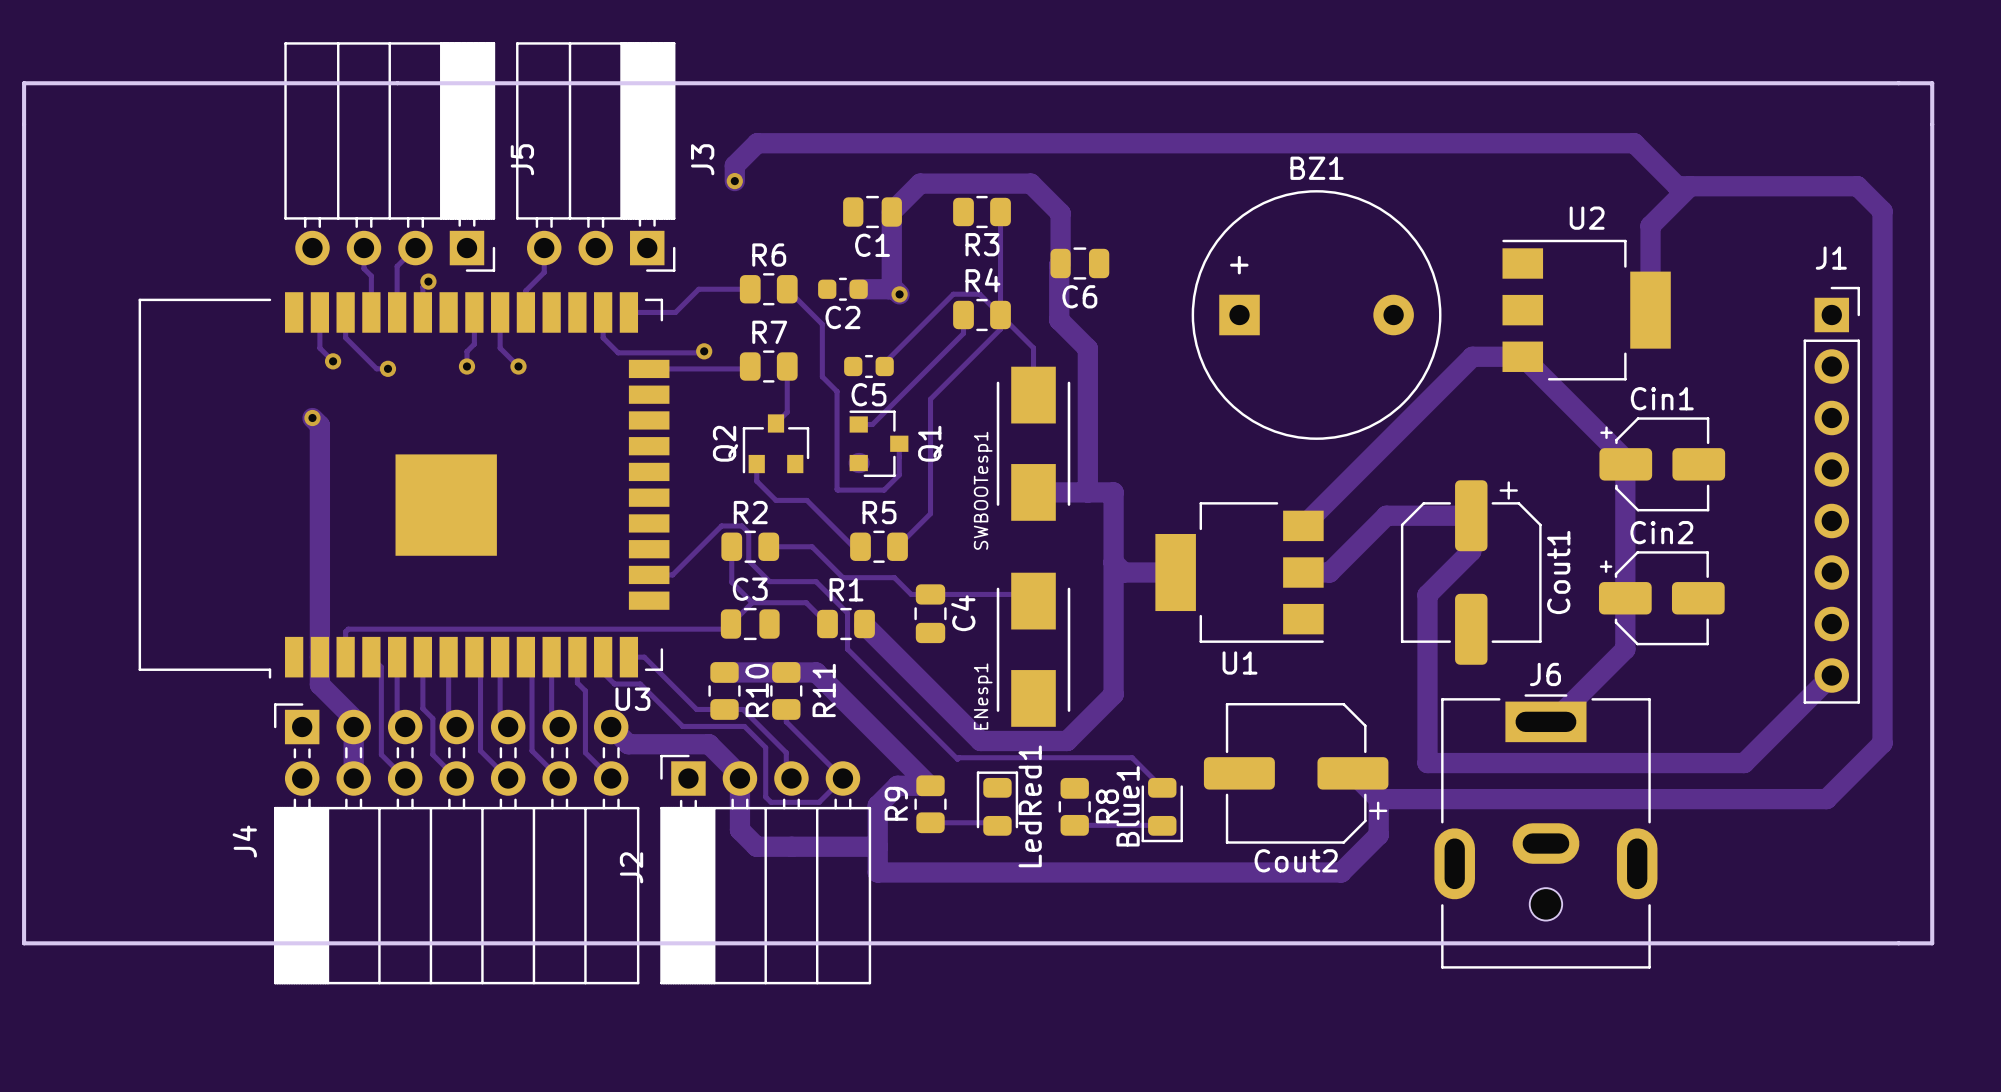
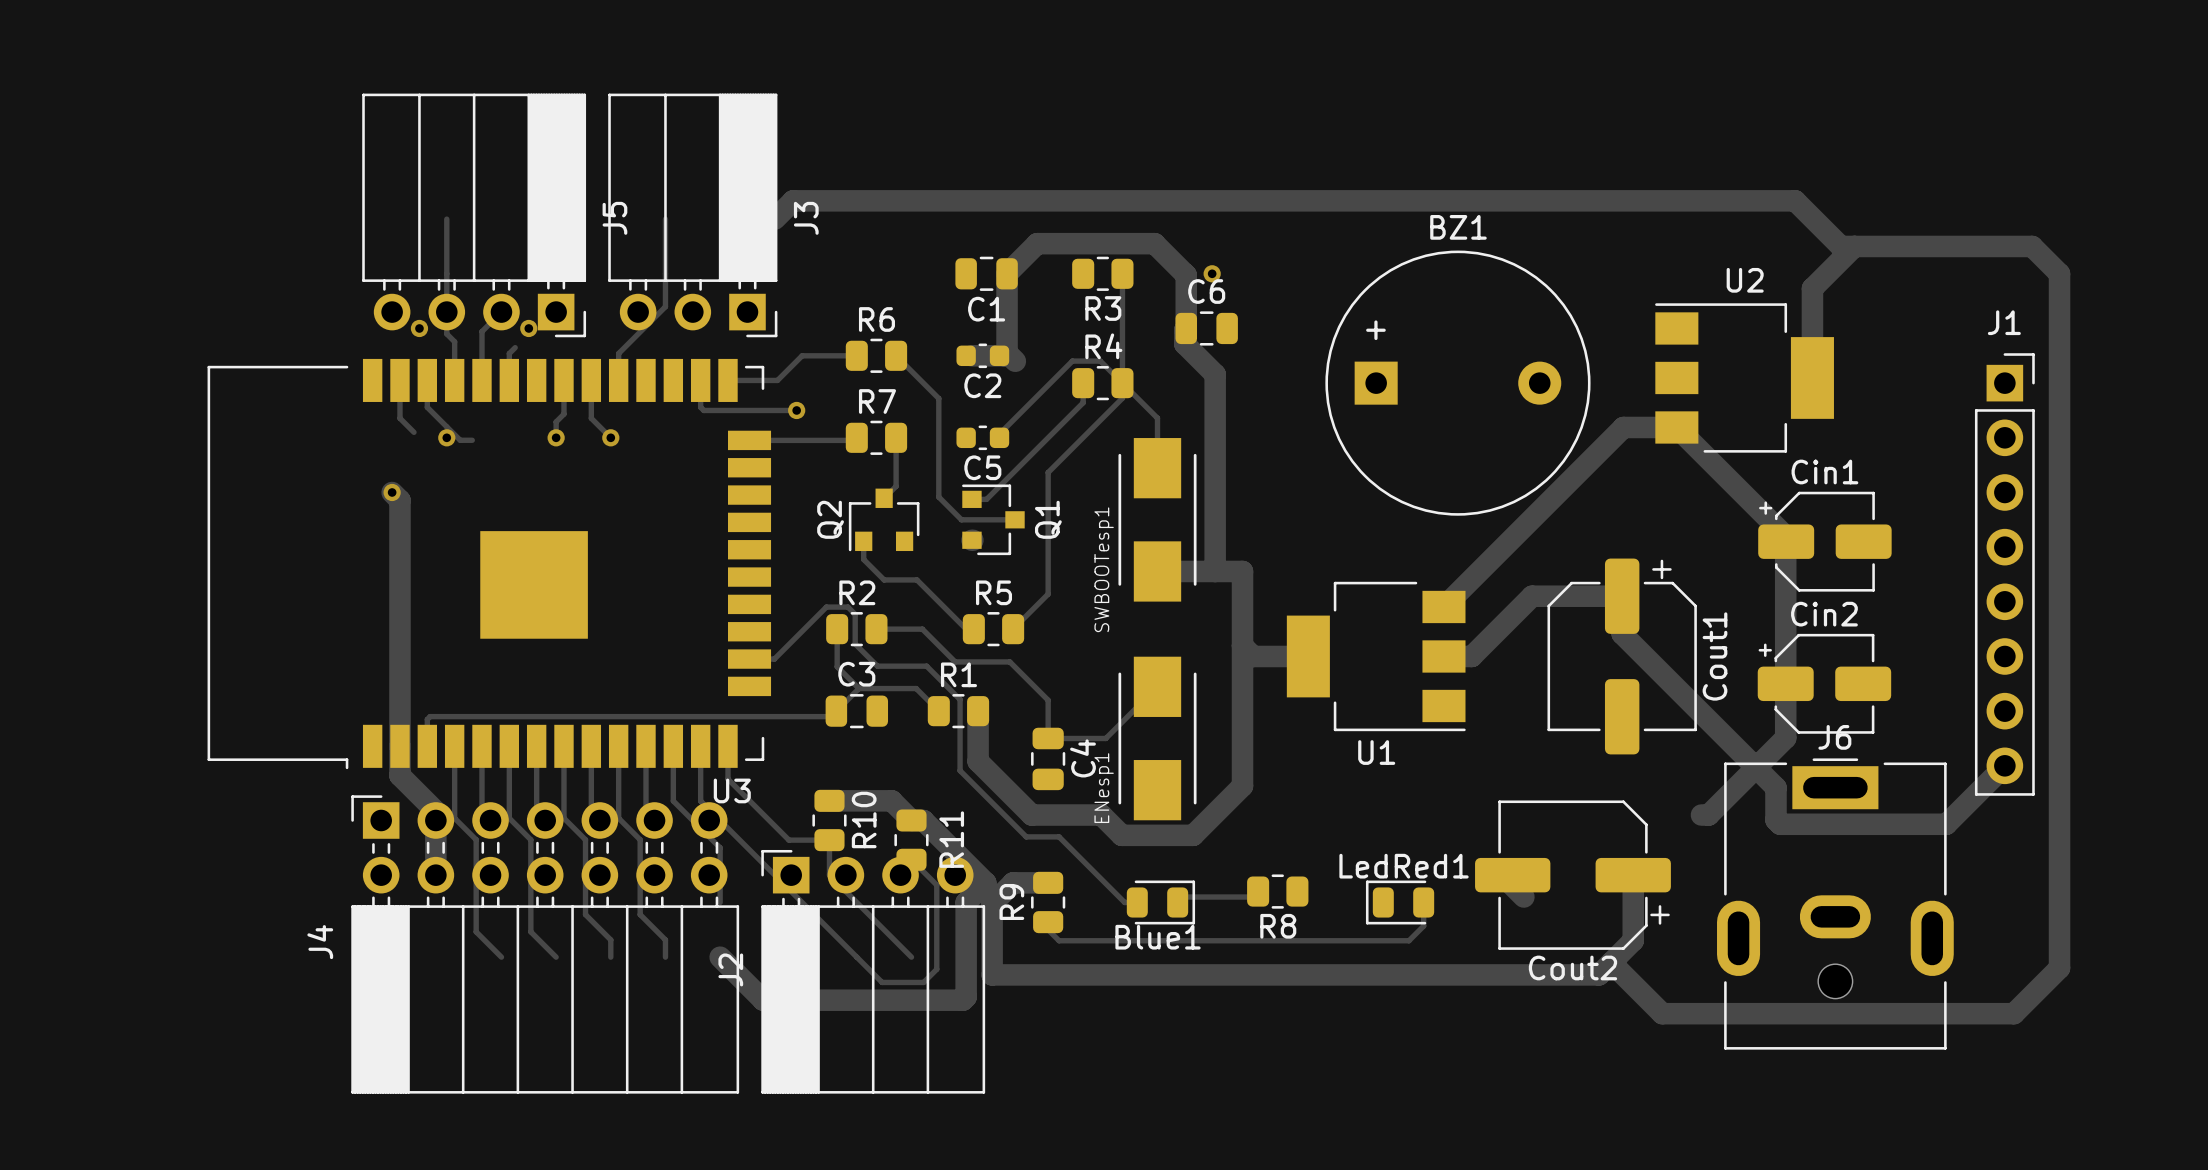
board edge: (24, 83) (1932, 83) (1932, 943) (24, 943) (24, 83) -> none
track: (757, 143) (734, 165) (734, 181) -> (864, 200) (793, 200) (774, 219)
track: none -> (446, 219) (446, 312)
via: (734, 181) -> none
via: none -> (1212, 273)
track: (1882, 211) (1882, 743) (1826, 799) (1378, 799) (1378, 835) (1341, 872) -> (2058, 272) (2059, 968) (2013, 1013) (1662, 1013) (1611, 962)
track: (544, 248) (544, 272) (525, 290) -> (665, 219) (665, 306) (618, 353) (618, 357)
via: none -> (419, 328)
track: (1059, 278) (1059, 320) (1087, 348) -> (1184, 344) (1215, 374) (1215, 418)
via position: (428, 281) -> (528, 328)
C2 position: (842, 289) -> (982, 355)
via: (899, 294) -> none
C6 name position: C6 (1079, 296) -> C6 (1206, 291)
track: (822, 324) (822, 376) (837, 391) (837, 489) (884, 490) (899, 474) (899, 443) -> (933, 393) (938, 398) (938, 497) (961, 519) (1015, 519)
track: (606, 340) (618, 352) (704, 351) -> (703, 410) (796, 410)
via position: (704, 351) -> (796, 410)
via: (333, 361) -> none
via: none -> (446, 437)
via: (387, 368) -> none
track: (1471, 551) (1427, 594) (1427, 763) (1744, 763) (1776, 730) -> (1622, 633) (1775, 787) (1775, 819) (1780, 824) (1946, 824)
track: (911, 594) (1026, 594) (1033, 601) -> (1027, 679) (1048, 700) (1048, 738) (1105, 738) (1157, 686)
C4 position: (930, 613) -> (1048, 758)
track: (864, 624) (980, 741) (999, 741) -> (978, 712) (978, 761) (1031, 815) (1101, 815) (1121, 835)
track: (847, 649) (940, 742) -> (960, 737) (960, 770) (1026, 836) (1059, 836)
track: (371, 657) (381, 667) (381, 754) (405, 778) -> (454, 746) (454, 818) (476, 839) (476, 931) (501, 957)
track: (474, 657) (480, 663) (480, 750) (508, 778) -> (563, 746) (563, 818) (585, 839) (585, 914) (610, 939) (610, 957)
track: (525, 657) (532, 663) (532, 750) (559, 778) -> (618, 746) (618, 818) (640, 839) (640, 914) (665, 939) (665, 957)
track: (628, 657) (644, 657) (696, 709) (743, 709) (786, 752) (786, 778) -> (728, 746) (728, 779) (788, 840) (829, 840) (829, 875) (911, 957)
track: (603, 672) (614, 684) (640, 684) (682, 726) (744, 726) (765, 747) (765, 797) (771, 802) (819, 802) (842, 778) (786, 721) (786, 709) -> (700, 762) (700, 801) (882, 982) (923, 982) (936, 969) (936, 885) (911, 859)
track: (724, 672) (816, 672) (929, 785) -> none
track: (577, 682) (585, 690) (585, 752) (611, 778) -> (673, 773) (673, 801) (720, 847) (720, 902)
R10 position: (724, 690) -> (829, 820)
R11 position: (786, 690) -> (911, 840)
Cout2 footprint: [1203, 703, 1389, 844] -> [1475, 800, 1671, 950]
track: (422, 708) (432, 718) (432, 754) (456, 778) -> (509, 801) (509, 818) (530, 839) (530, 931) (556, 957)
track: none -> (829, 800) (891, 800) (911, 820) (923, 820) (985, 882) (966, 902) (966, 996) (962, 1000) (763, 1000) (720, 957)
track: (611, 727) (628, 744) (709, 744) (739, 775) (739, 830) (756, 846) (877, 846) -> none
track: (957, 759) (1132, 757) (1162, 787) -> (1076, 854) (1124, 902) (1137, 902)
track: none -> (1633, 875) (1633, 940) (1598, 974) (1484, 974)
track: none -> (1258, 891) (1252, 897) (1183, 897) (1177, 902)
LedRed1 rotation: 0° (997, 803) -> 90° counterclockwise (1400, 902)
LedRed1 position: (997, 803) -> (1400, 902)
track: none -> (1423, 902) (1423, 926) (1408, 940) (1059, 940) (1048, 929)
R8 rotation: 0° (1074, 806) -> 90° clockwise (1277, 891)
R8 position: (1074, 806) -> (1277, 891)
Blue1 rotation: 0° (1162, 810) -> 90° counterclockwise (1160, 902)
Blue1 position: (1162, 810) -> (1160, 902)
track: (930, 822) (994, 822) (997, 825) -> none
track: (1074, 825) (1162, 825) -> none
J6 position: (1545, 831) -> (1835, 904)

